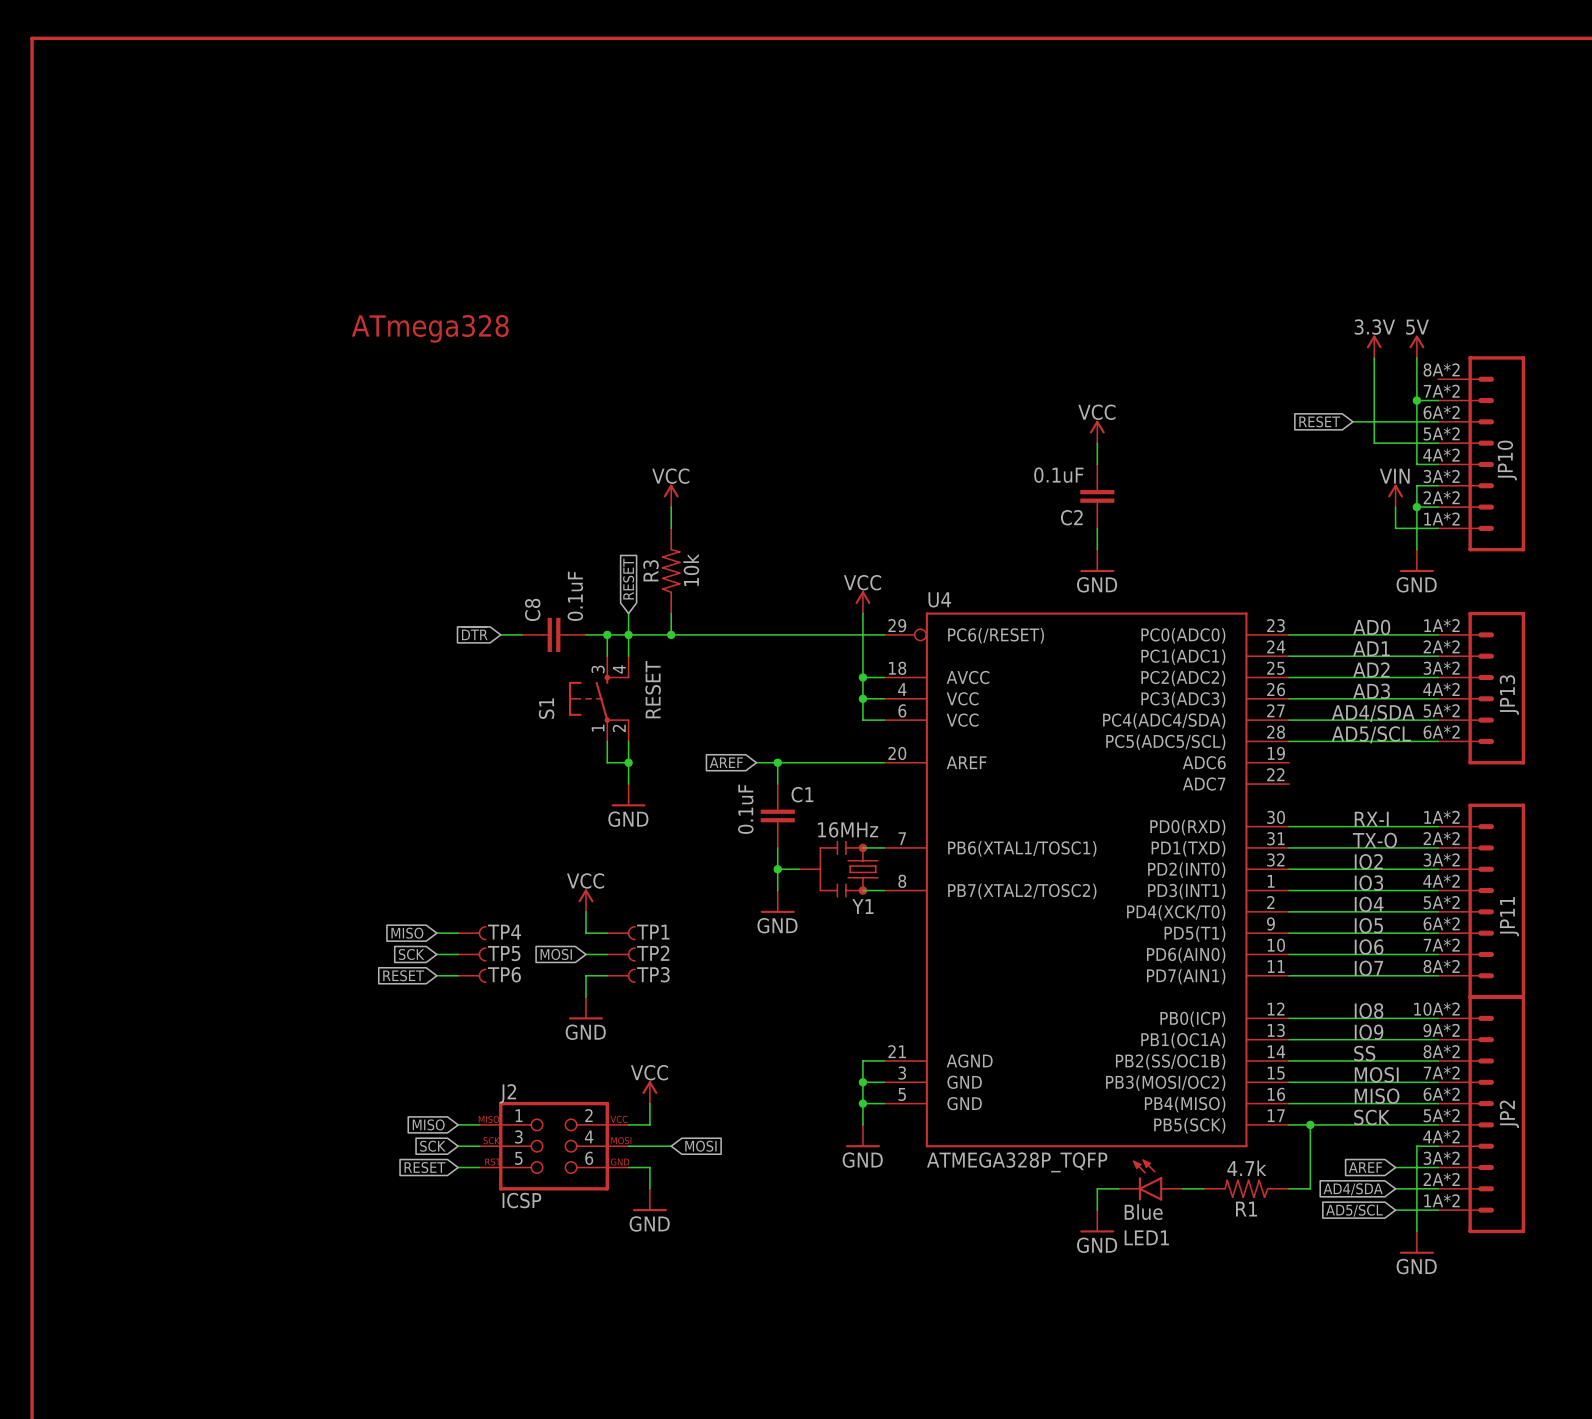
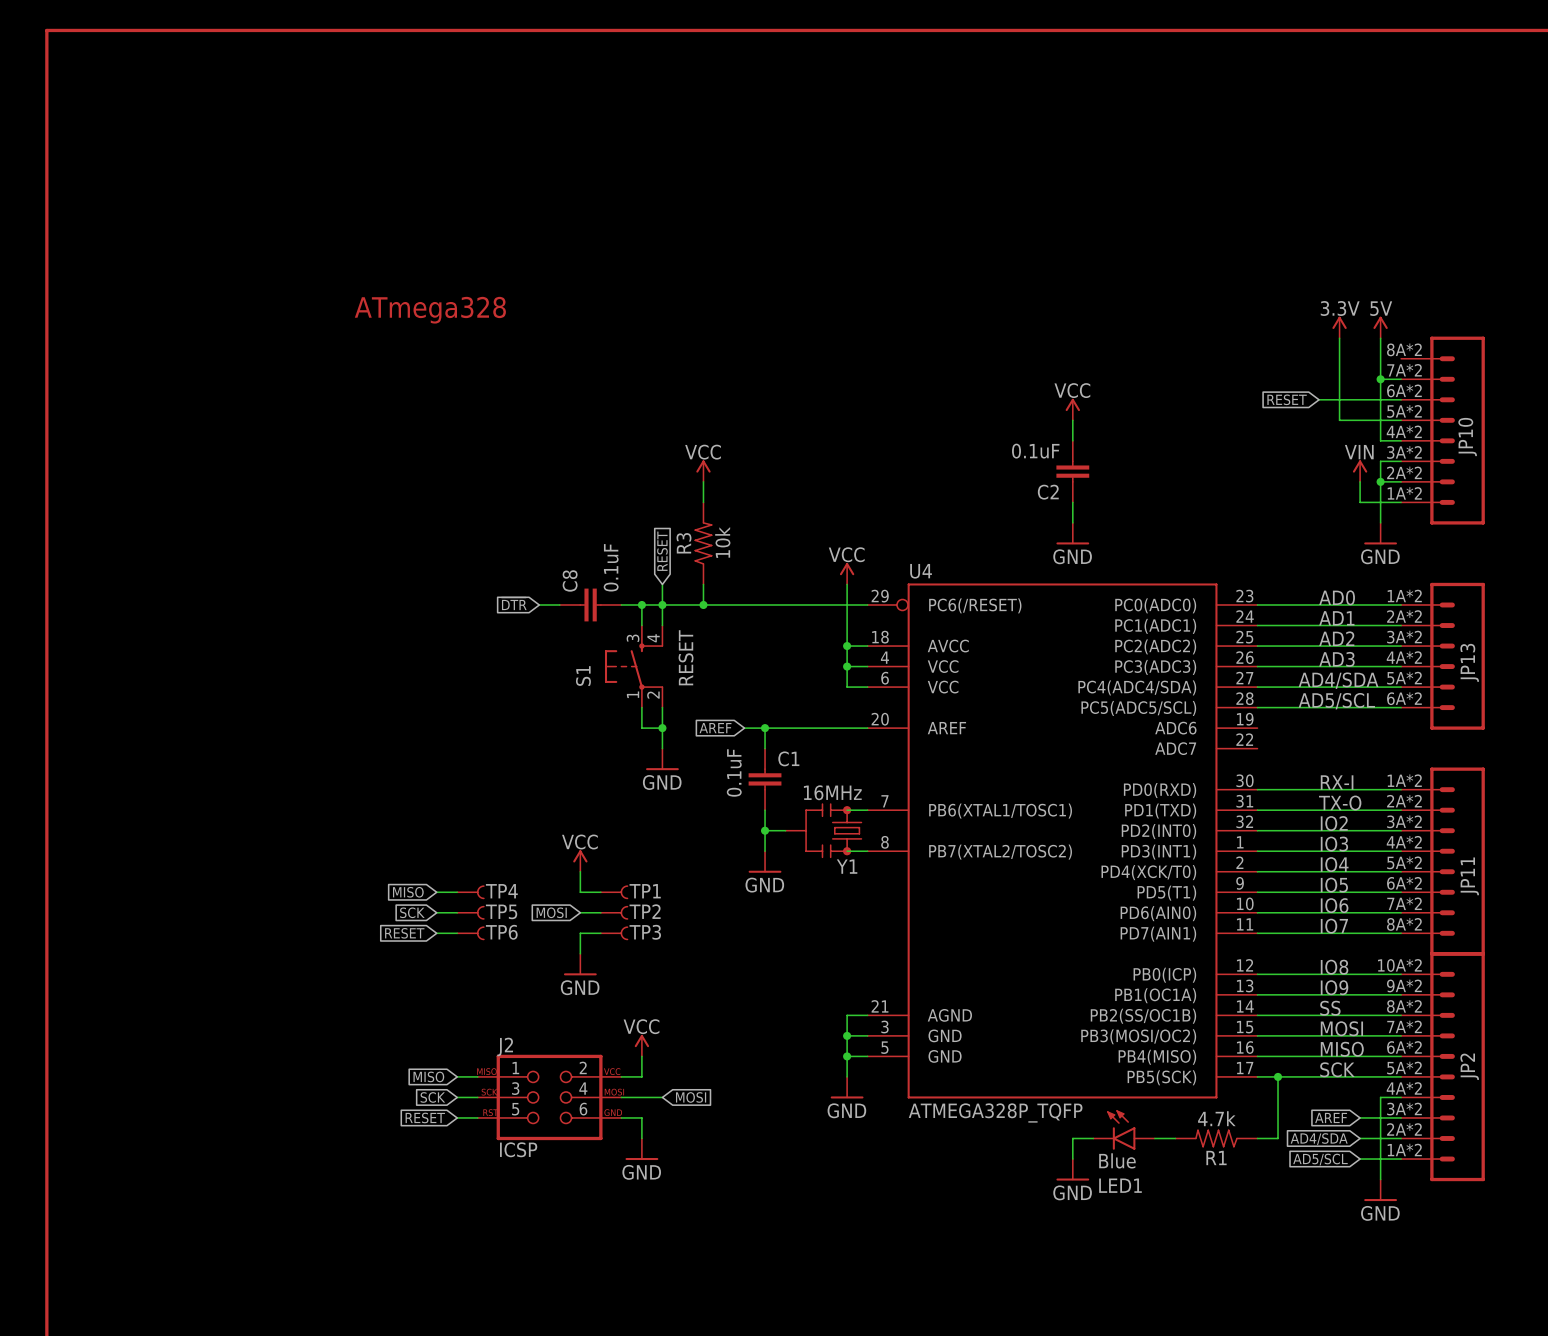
power symbol position: VCC (671, 495) -> VCC (703, 471)
wire: (671, 507) (671, 528) -> (703, 481) (703, 502)
R3 position: (671, 570) -> (703, 543)
global label position: RESET (628, 579) -> RESET (662, 551)
wire: (628, 613) (628, 656) -> none
wire: none -> (703, 584) (703, 604)
global label position: ~{DTR} (474, 633) -> ~{DTR} (514, 603)
C8 position: (554, 634) -> (590, 604)
wire: (607, 634) (607, 656) -> (641, 604) (641, 625)
junction: (607, 634) -> none
junction: (628, 634) -> none
junction: none -> (641, 604)
wire: none -> (662, 604) (662, 625)
junction: none -> (703, 604)
S1 position: (599, 698) -> (634, 666)
wire: (607, 741) (607, 762) (628, 762) -> (641, 707) (641, 728) (662, 728)
wire: (628, 741) (628, 784) -> (662, 707) (662, 748)
junction position: (628, 762) -> (662, 728)
power symbol position: GND (628, 795) -> GND (662, 759)

